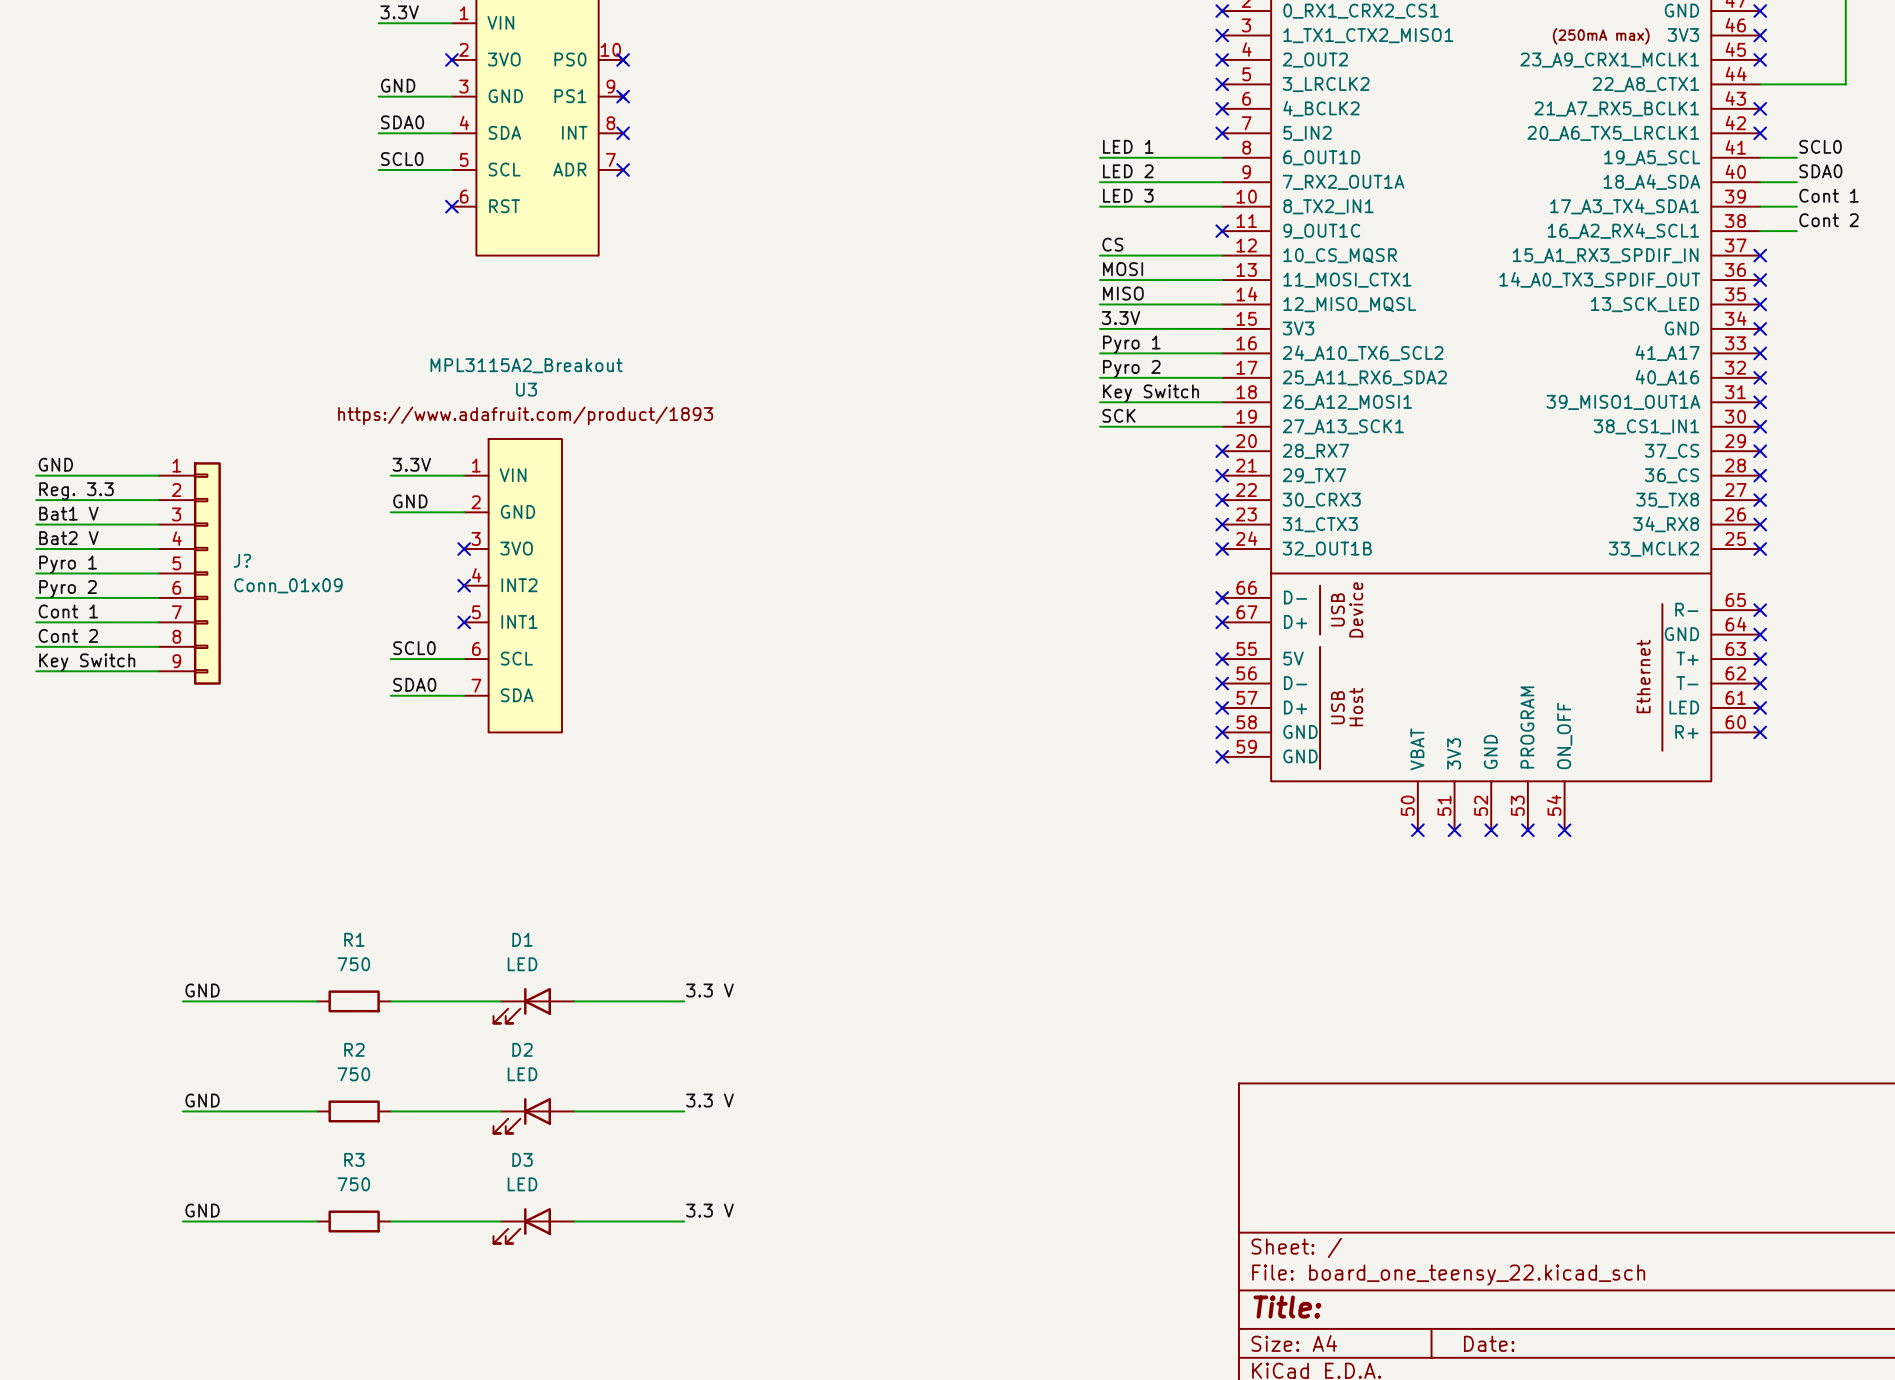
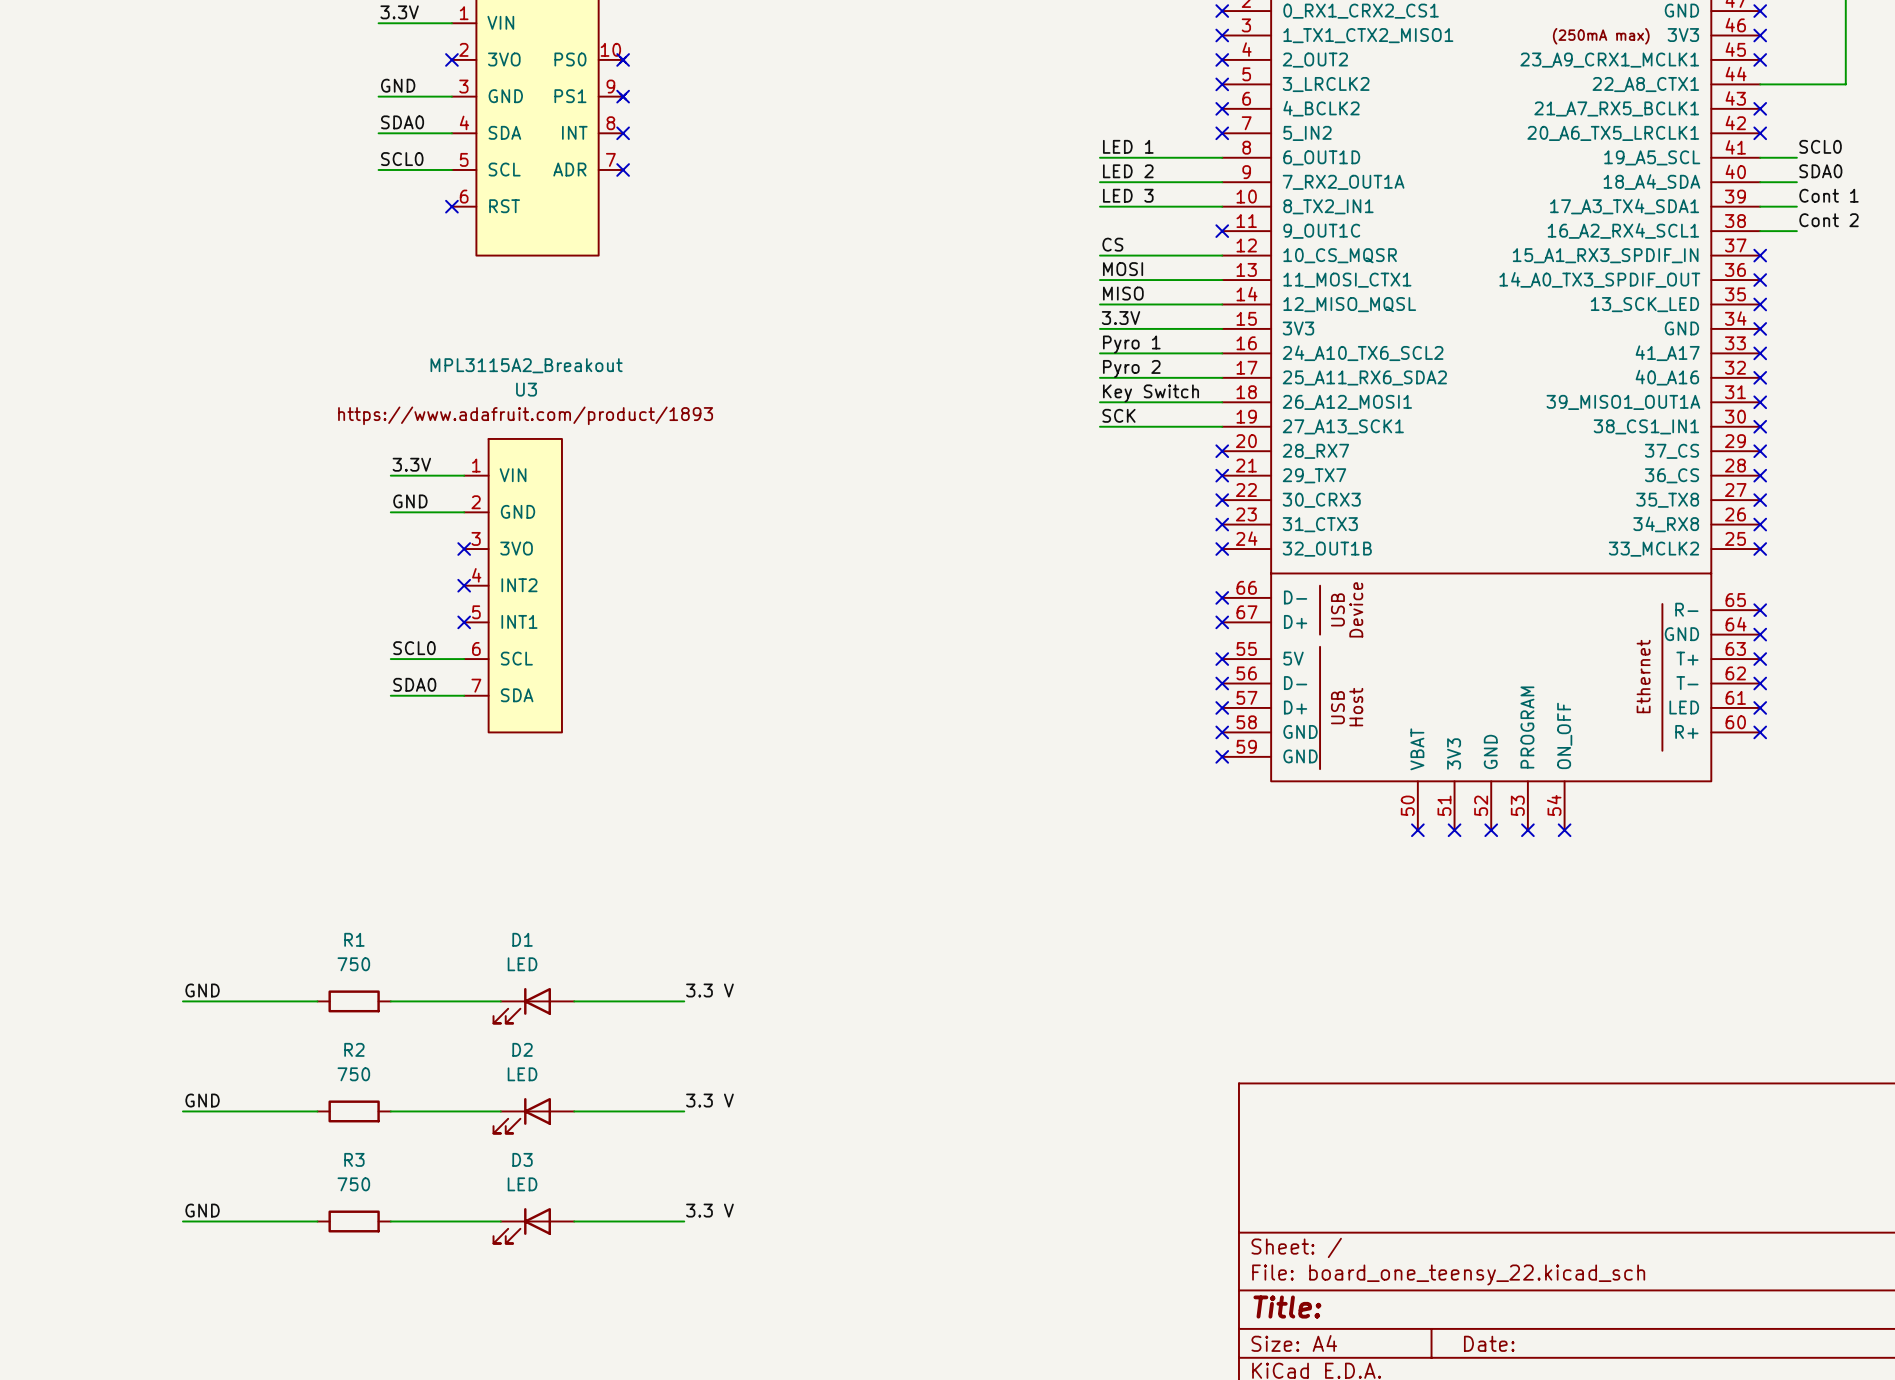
label: GND (55, 464) -> none
wire: (36, 475) (158, 475) -> none
label: Reg. 3.3 (76, 491) -> none
wire: (36, 500) (158, 500) -> none
label: Bat1 V (68, 513) -> none
wire: (36, 524) (158, 524) -> none
label: Bat2 V (68, 538) -> none
wire: (36, 549) (158, 549) -> none
label: Pyro 1 (68, 564) -> none
wire: (36, 573) (158, 573) -> none
J?: Conn_01x09 (189, 573) -> none
label: Pyro 2 (68, 589) -> none
wire: (36, 597) (158, 597) -> none
label: Cont 1 (68, 611) -> none
wire: (36, 622) (158, 622) -> none
label: Cont 2 (68, 635) -> none
wire: (36, 646) (158, 646) -> none
label: Key Switch (87, 662) -> none
wire: (36, 671) (158, 671) -> none

